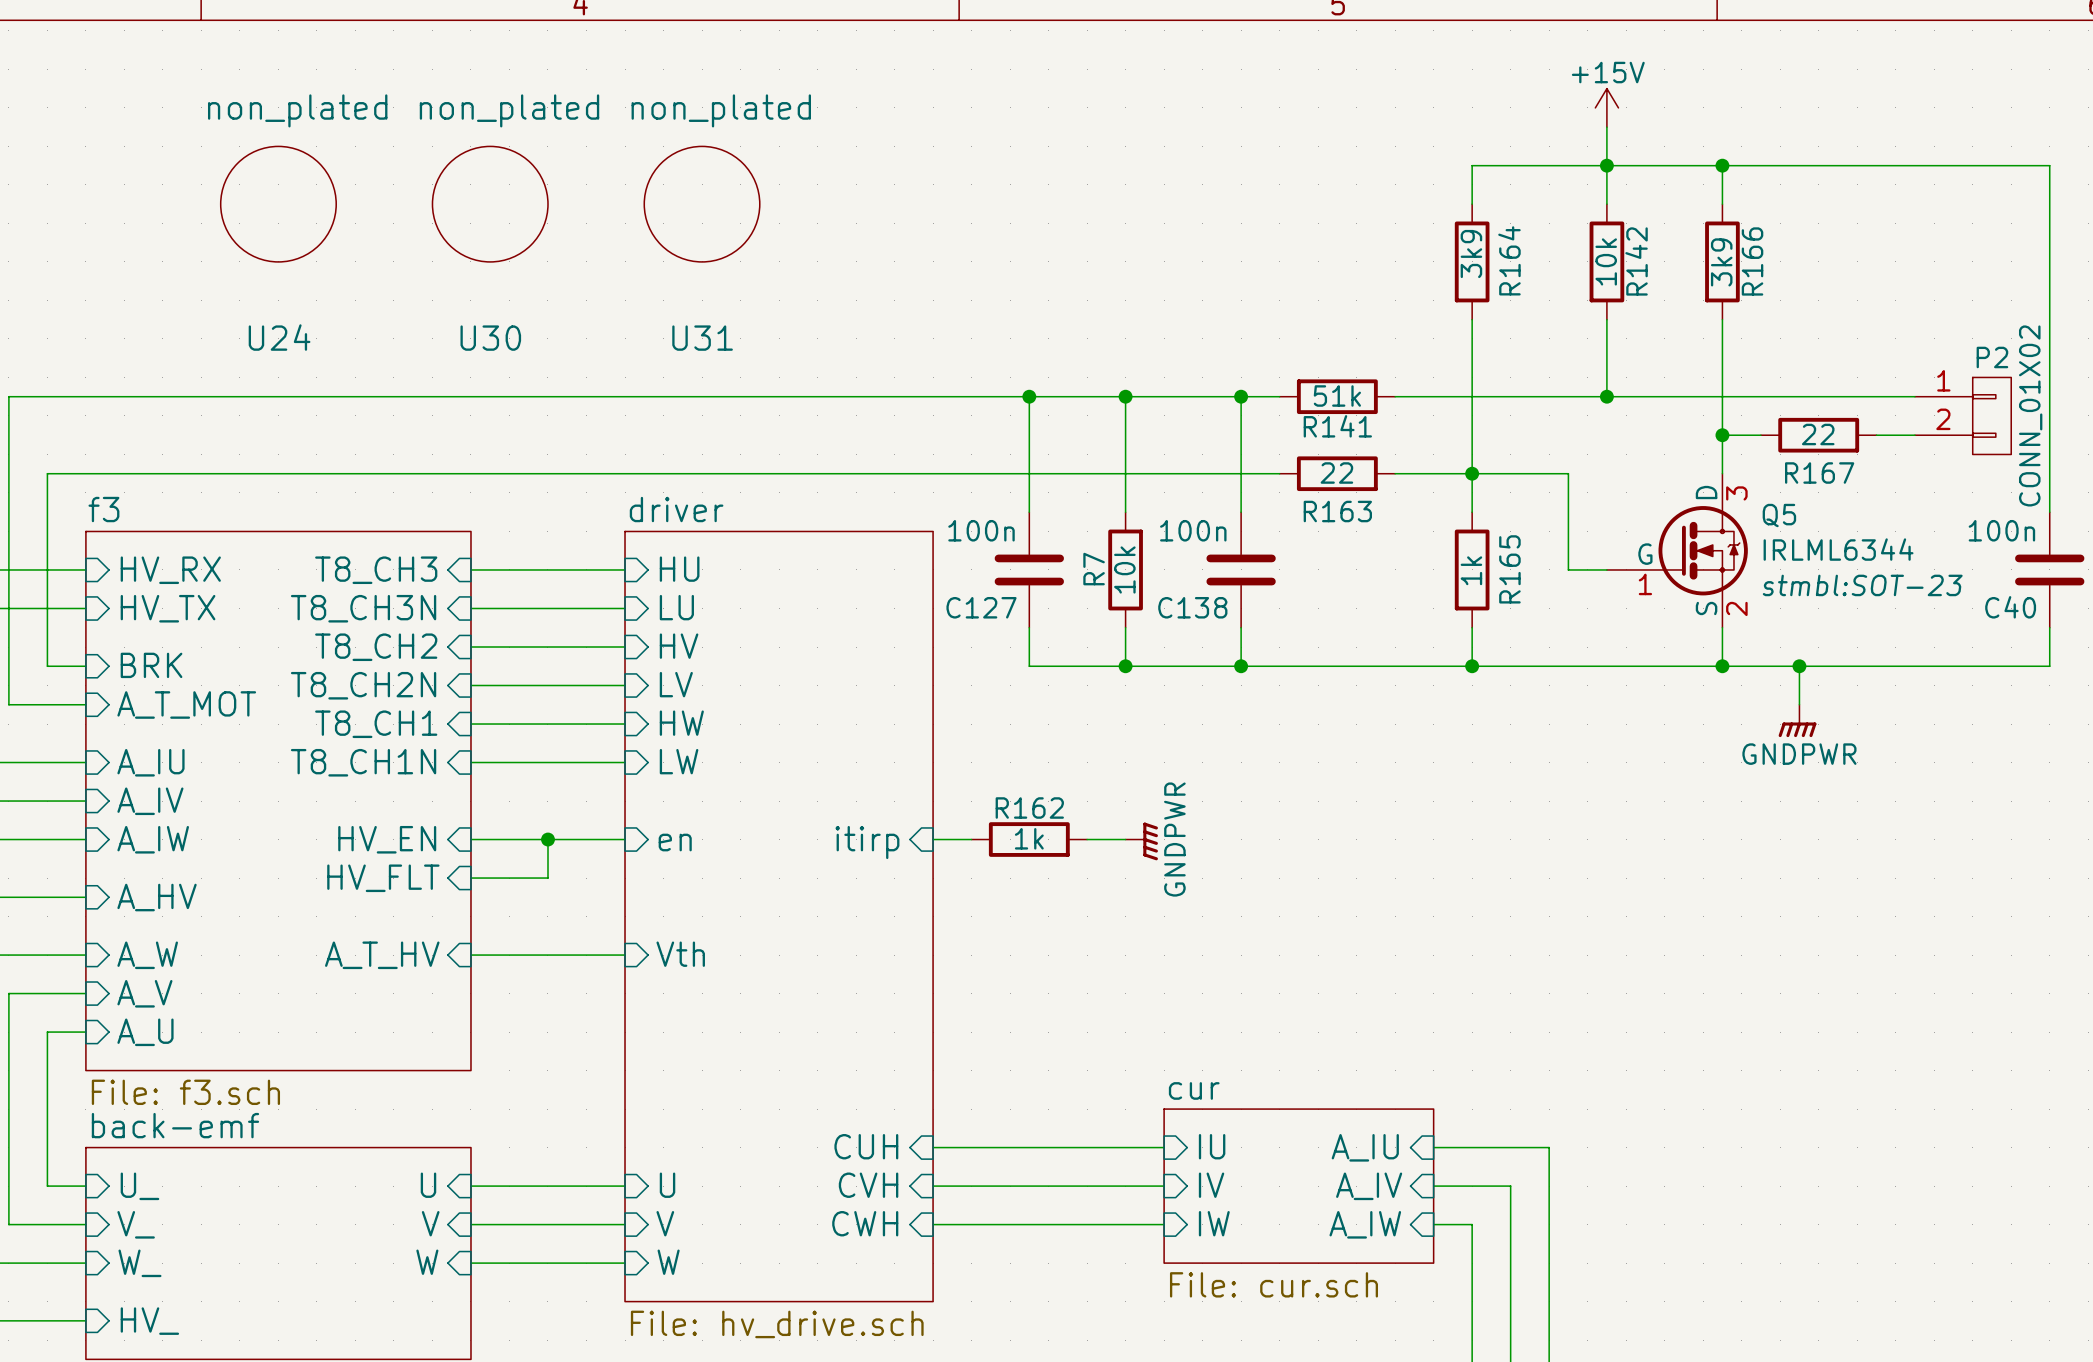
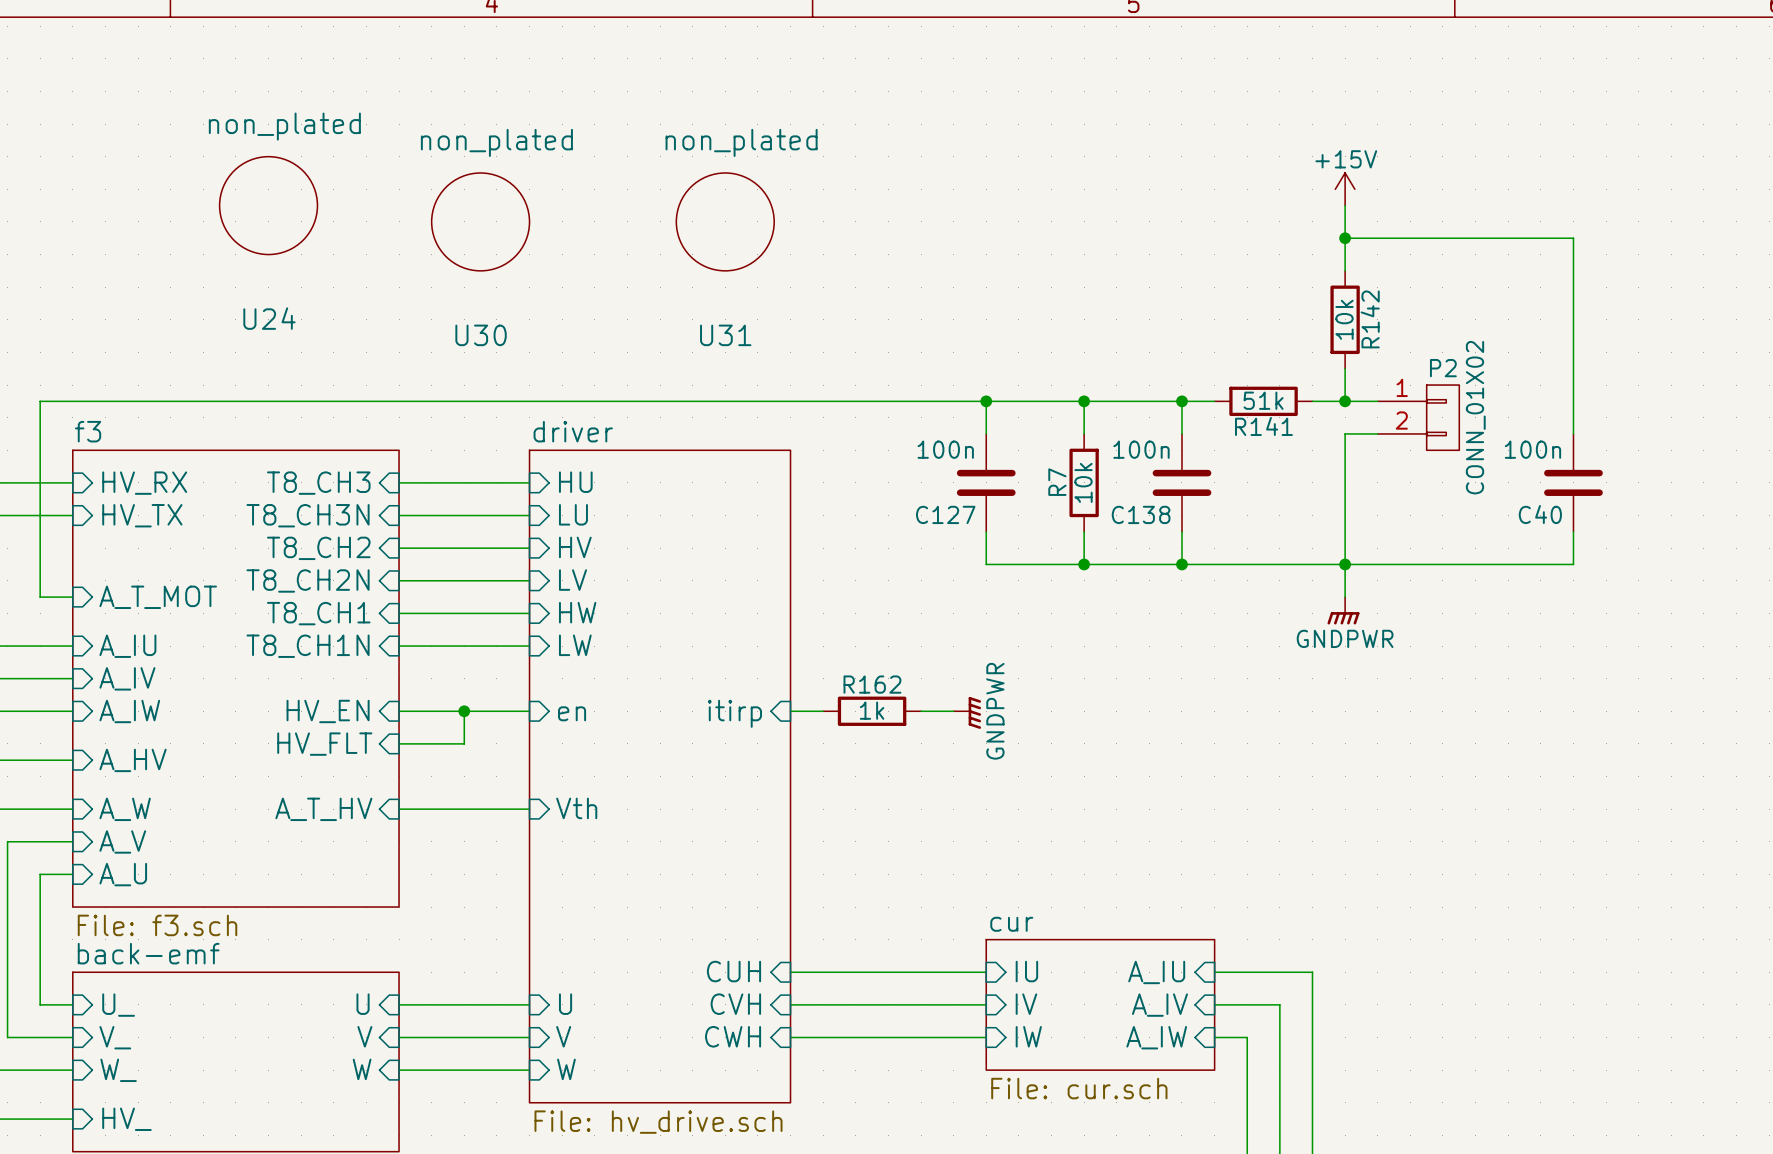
power symbol position: +15V (1606, 107) -> +15V (1345, 189)
wire: (1606, 127) (1606, 204) -> none
junction: (1606, 165) -> none
wire: (1722, 165) (1722, 204) -> none
junction: (1722, 165) -> none
U24 position: (278, 204) -> (268, 205)
U30 position: (490, 204) -> (480, 221)
U31 position: (702, 204) -> (725, 221)
wire: (1472, 204) (1472, 165) (2049, 165) (2049, 512) -> none
R164: 3k9 (1472, 261) -> none
R142 position: (1606, 261) -> (1345, 319)
R166: 3k9 (1722, 261) -> none
wire: none -> (1345, 238) (1573, 238) (1573, 433)
junction: none -> (1345, 238)
wire: (1472, 319) (1472, 512) -> none
wire: (1606, 319) (1606, 396) -> (1345, 205) (1345, 270)
wire: (1722, 319) (1722, 473) -> none
wire: (1029, 396) (1029, 512) -> none
junction: (1029, 396) -> none
wire: (1125, 396) (1125, 512) -> none
junction: (1125, 396) -> none
wire: (1241, 396) (1241, 512) -> none
junction: (1241, 396) -> none
wire: (1279, 396) (8, 396) (8, 704) (47, 704) -> none
R141 position: (1337, 396) -> (1263, 401)
wire: (1395, 396) (1914, 396) -> none
junction: (1606, 396) -> none
P2 position: (1963, 415) -> (1418, 417)
wire: (1722, 435) (1760, 435) -> none
junction: (1722, 435) -> none
R167: 22 (1818, 435) -> none
wire: (1876, 435) (1914, 435) -> none
junction: none -> (986, 401)
junction: none -> (1084, 401)
R163: 22 (1337, 473) -> none
junction: none -> (1181, 401)
wire: (1433, 473) (1549, 473) -> none
junction: (1472, 473) -> none
wire: (1568, 473) (1568, 569) (1606, 569) -> (1328, 401) (1377, 401)
junction: none -> (1345, 401)
wire: none -> (1084, 433) (1084, 401) (1181, 401) (1181, 433)
wire: none -> (1377, 433) (1345, 433) (1345, 597)
Q5: IRLML6344 (1677, 550) -> none
C127 position: (1029, 569) -> (986, 482)
R7 position: (1125, 569) -> (1084, 482)
C138 position: (1241, 569) -> (1181, 482)
R165: 1k (1472, 569) -> none
C40 position: (2049, 569) -> (1573, 482)
wire: (1029, 627) (1029, 666) (1164, 666) -> (986, 531) (986, 564)
wire: (1125, 627) (1125, 666) -> (986, 401) (986, 433)
wire: (1241, 627) (1241, 666) -> (1084, 531) (1084, 564)
wire: (1472, 627) (1472, 666) -> (1181, 531) (1181, 564)
wire: (1722, 627) (1722, 666) -> (1345, 368) (1345, 401)
wire: (2049, 627) (2049, 666) (1857, 666) -> (1573, 531) (1573, 564)
sheet pin: BRK (151, 665) -> none
wire: (47, 666) (85, 666) -> (40, 564) (40, 597)
junction: (1125, 666) -> none
junction position: (1241, 666) -> (1084, 564)
junction: none -> (1181, 564)
junction: (1472, 666) -> none
junction: none -> (1345, 564)
junction: (1722, 666) -> none
wire: (1799, 666) (1799, 704) -> none
junction: (1799, 666) -> none
power symbol position: GNDPWR (1797, 720) -> GNDPWR (1343, 610)

